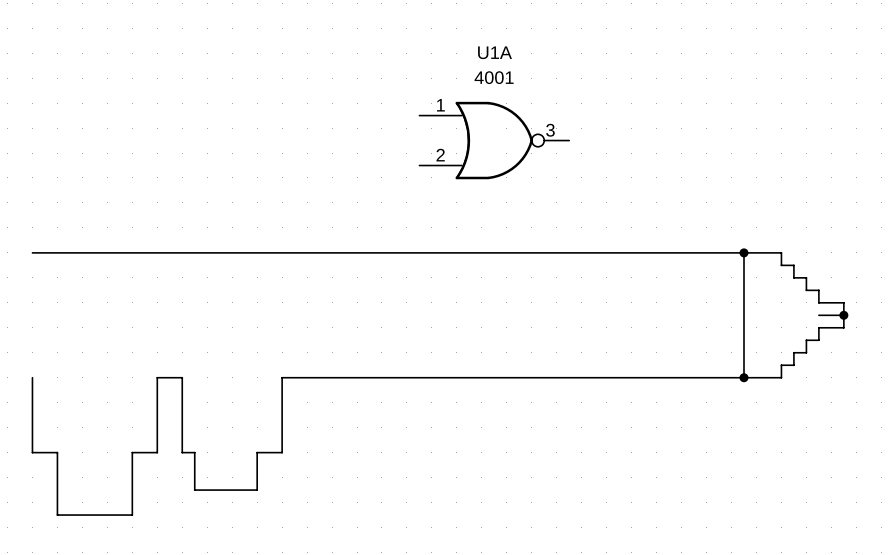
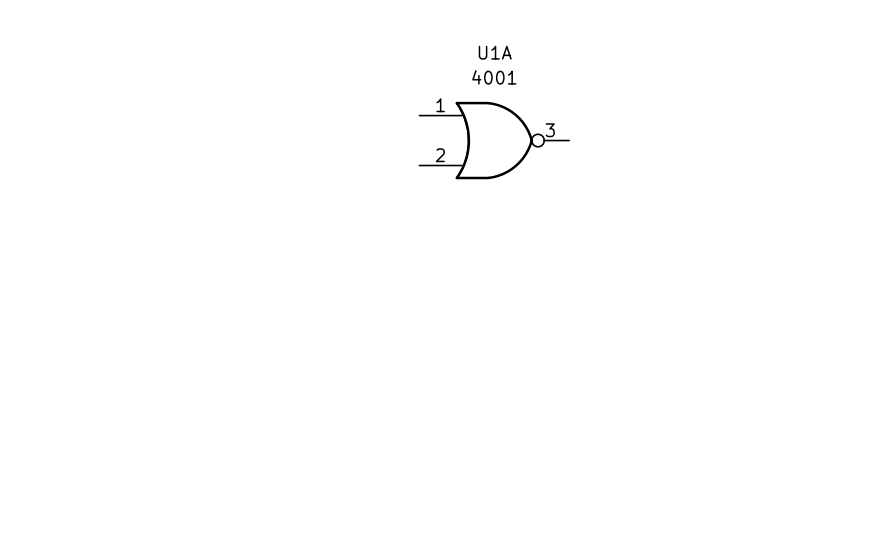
wire: (32, 252) (781, 252) (781, 265) (793, 265) (793, 277) (806, 277) (806, 290) (818, 290) (818, 302) (843, 302) (843, 327) (818, 327) (818, 340) (806, 340) (806, 352) (793, 352) (793, 365) (781, 365) (781, 377) (282, 377) (282, 452) (257, 452) (257, 490) (194, 490) (194, 452) (182, 452) (182, 377) (157, 377) (157, 452) (132, 452) (132, 515) (57, 515) (57, 452) (32, 452) (32, 377) -> none
wire: (743, 252) (743, 377) -> none
junction: (743, 252) -> none
wire: (818, 315) (843, 315) -> none
junction: (843, 315) -> none
junction: (743, 377) -> none

